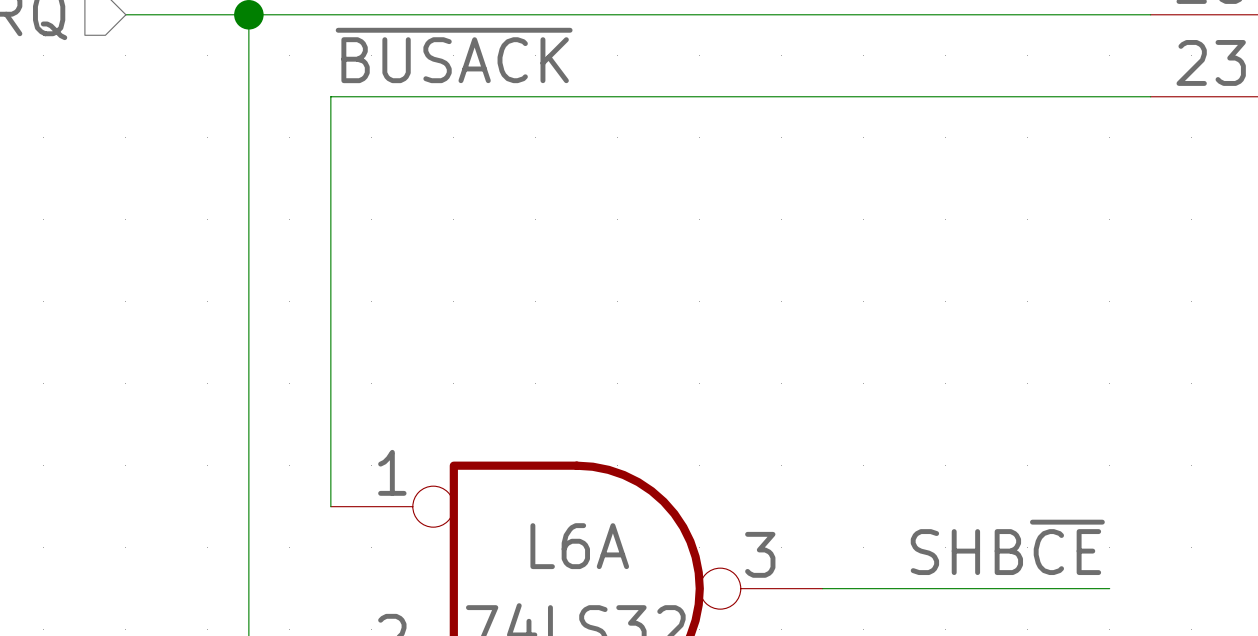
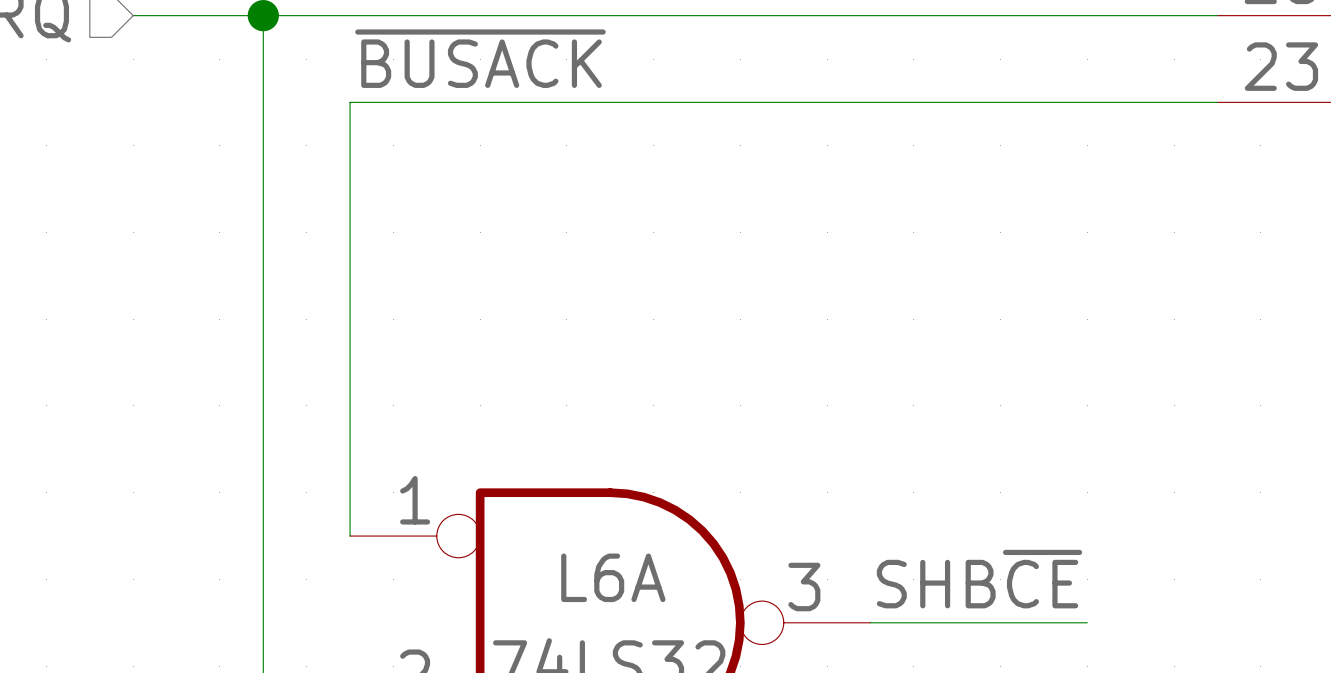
label position: SHB~{CE} (1007, 547) -> SHB~{CE} (979, 579)
wire: (1027, 588) (1109, 588) -> none

